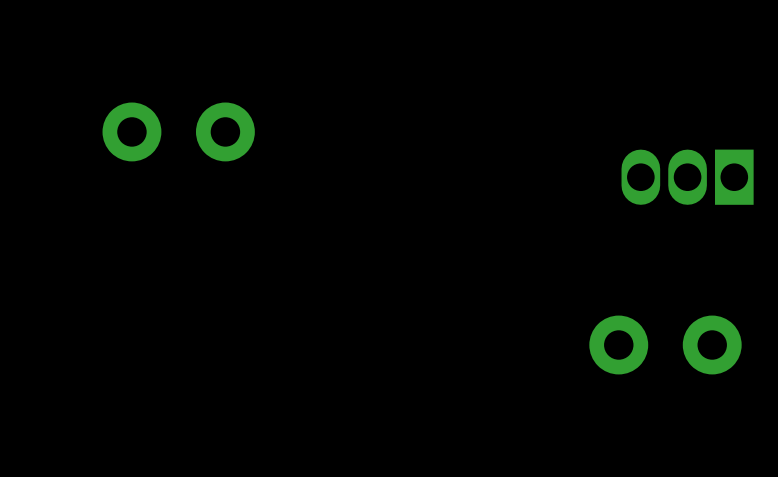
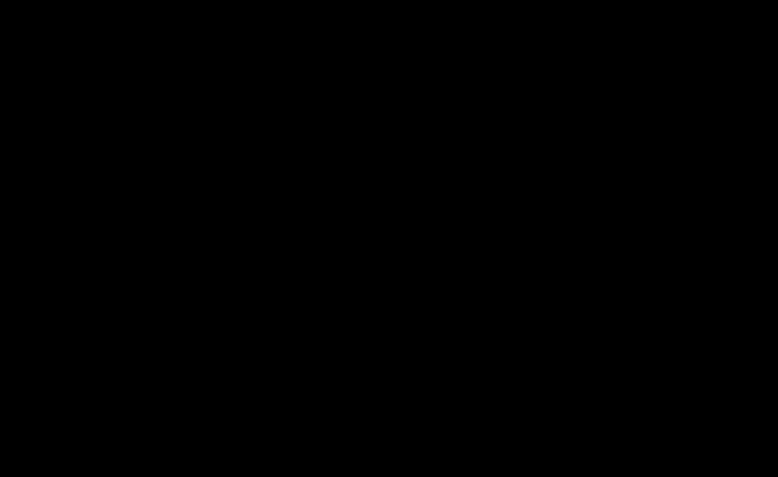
part: (178, 131) -> none
part: (687, 177) -> none
part: (665, 345) -> none

